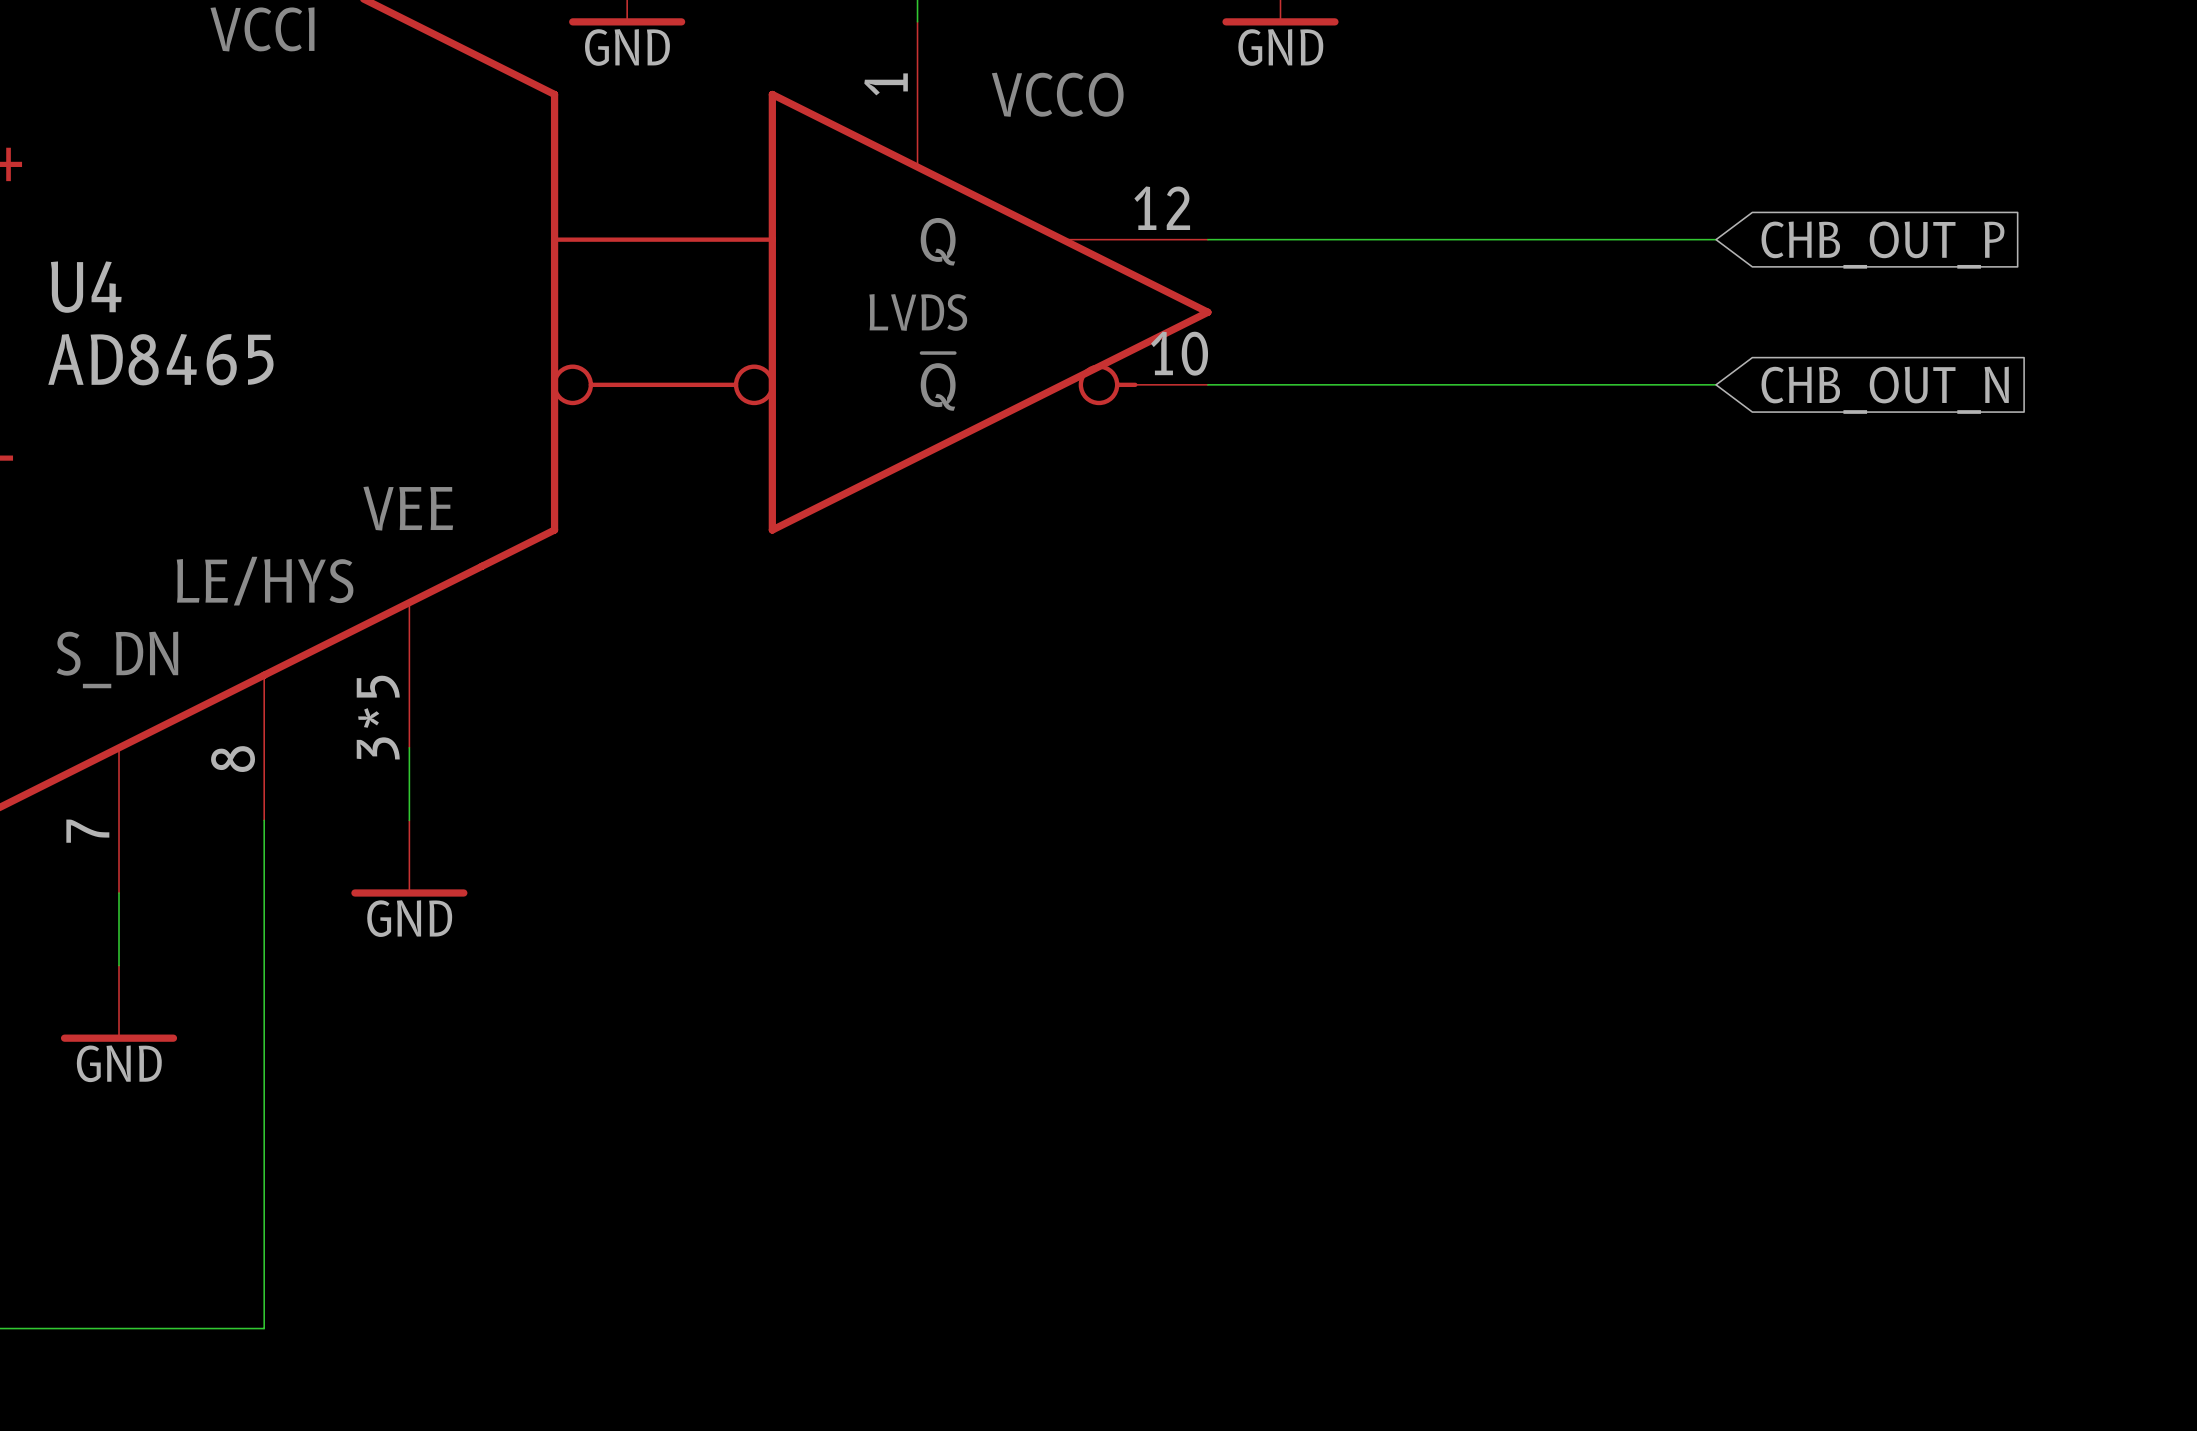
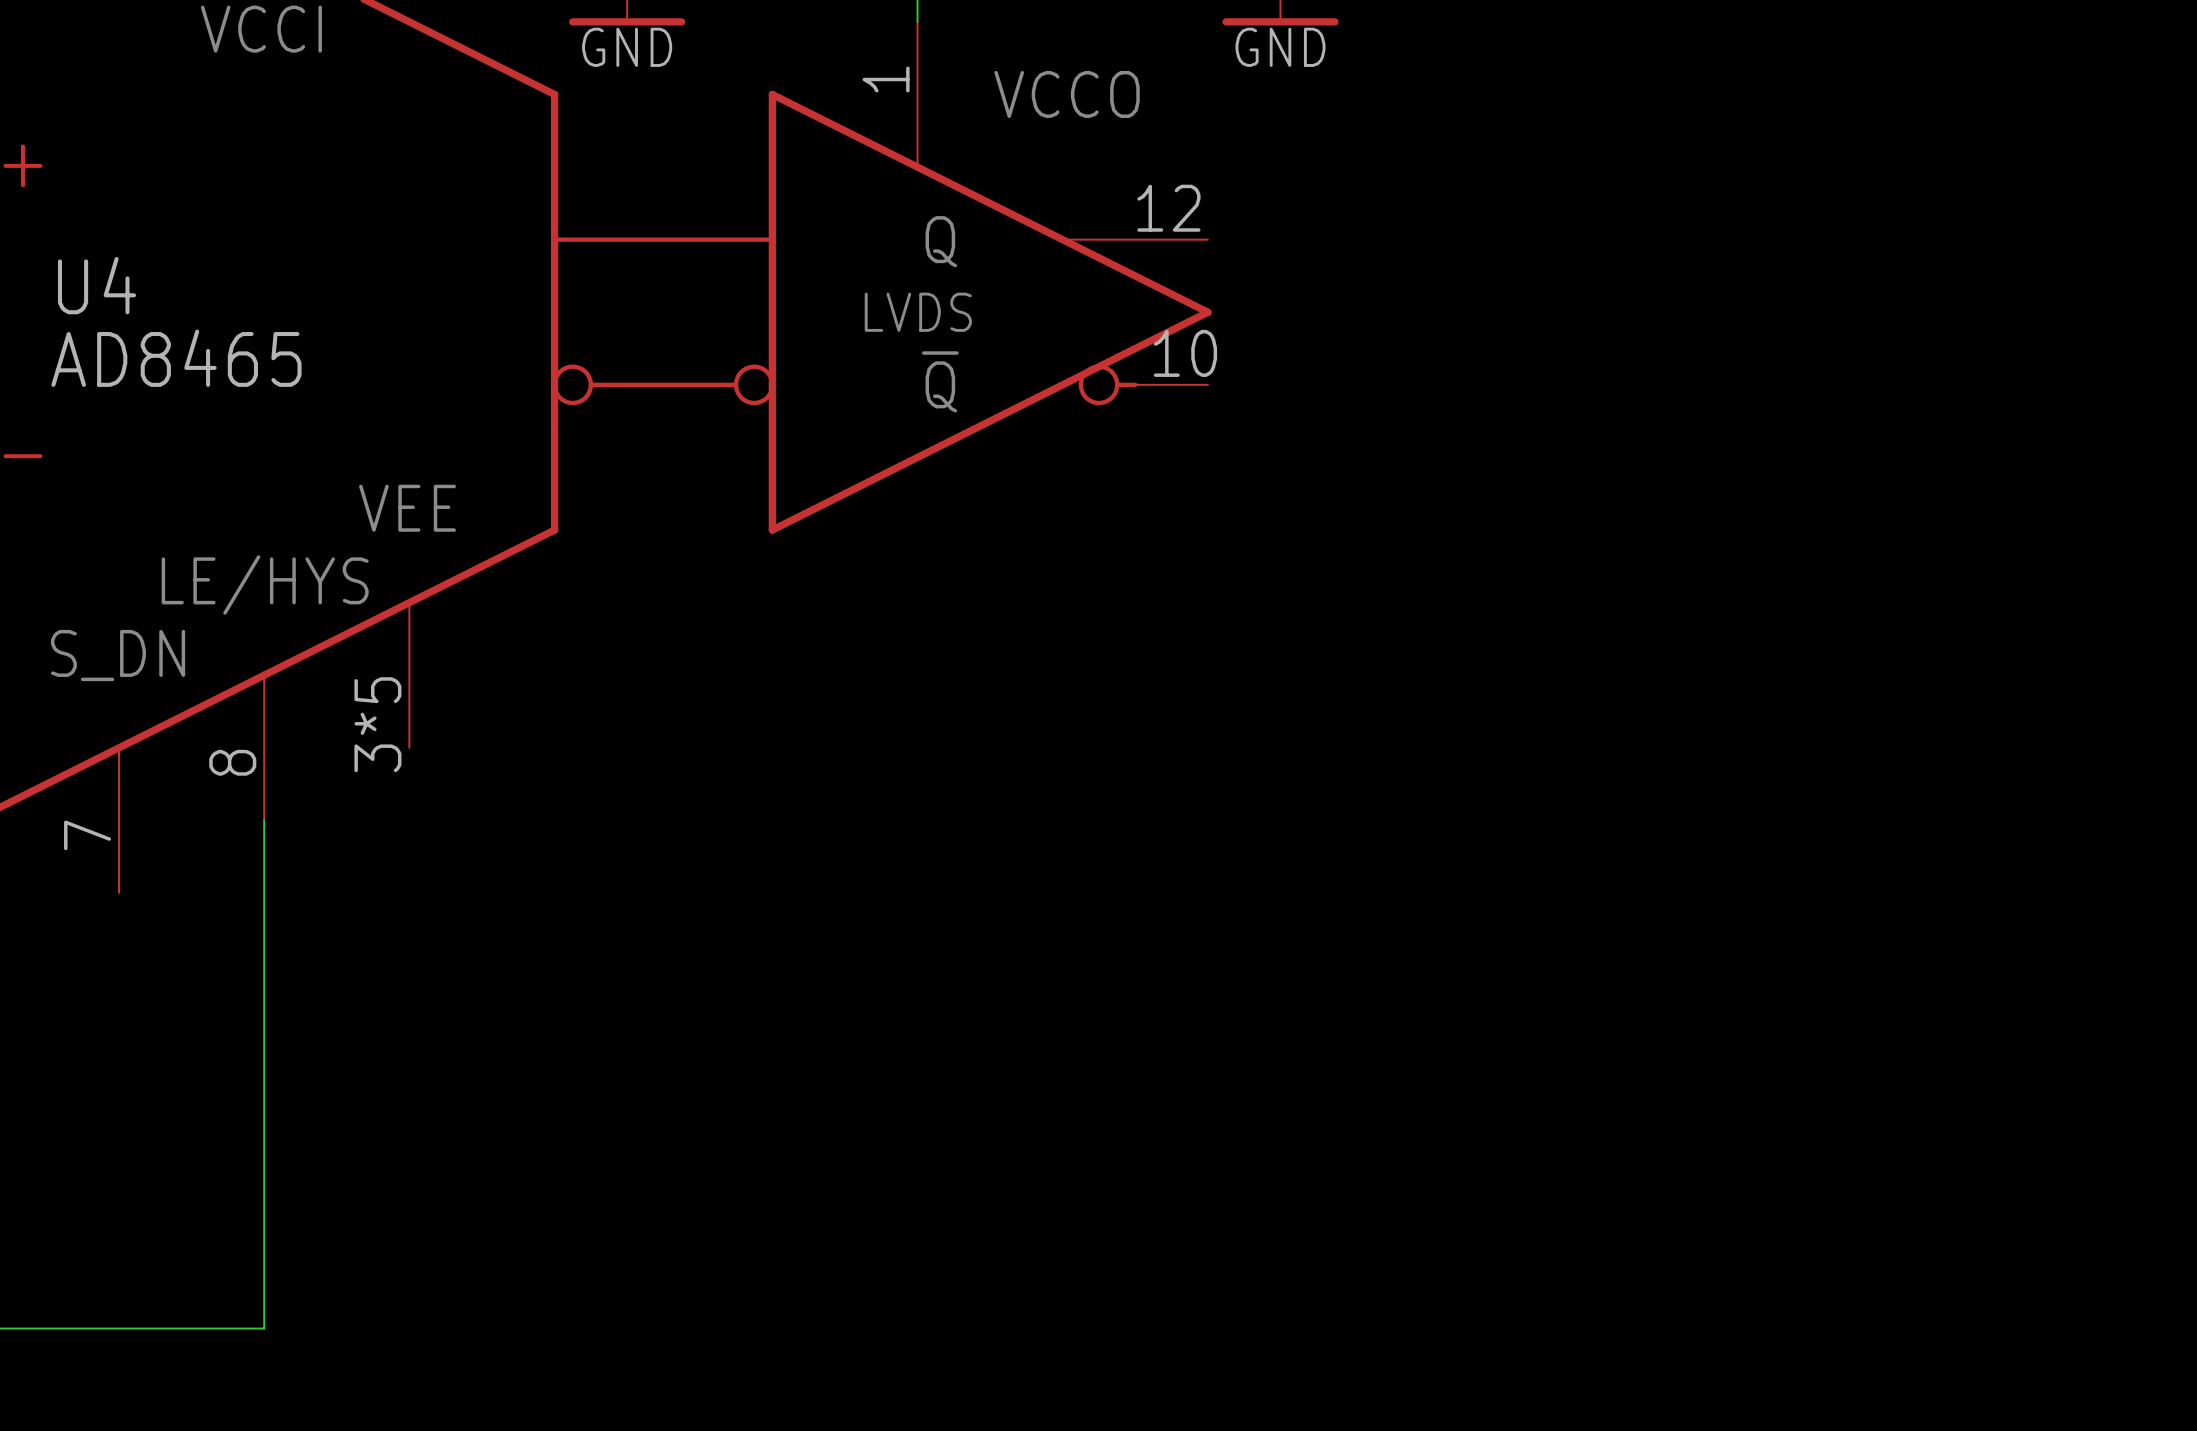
wire: (1207, 239) (1716, 239) -> none
global label: CHB_OUT_P (1882, 245) -> none
wire: (1207, 384) (1716, 384) -> none
global label: CHB_OUT_N (1885, 390) -> none
wire: (409, 747) (409, 820) -> none
power symbol: GND (409, 858) -> none
wire: (119, 892) (119, 965) -> none
power symbol: GND (119, 1003) -> none

